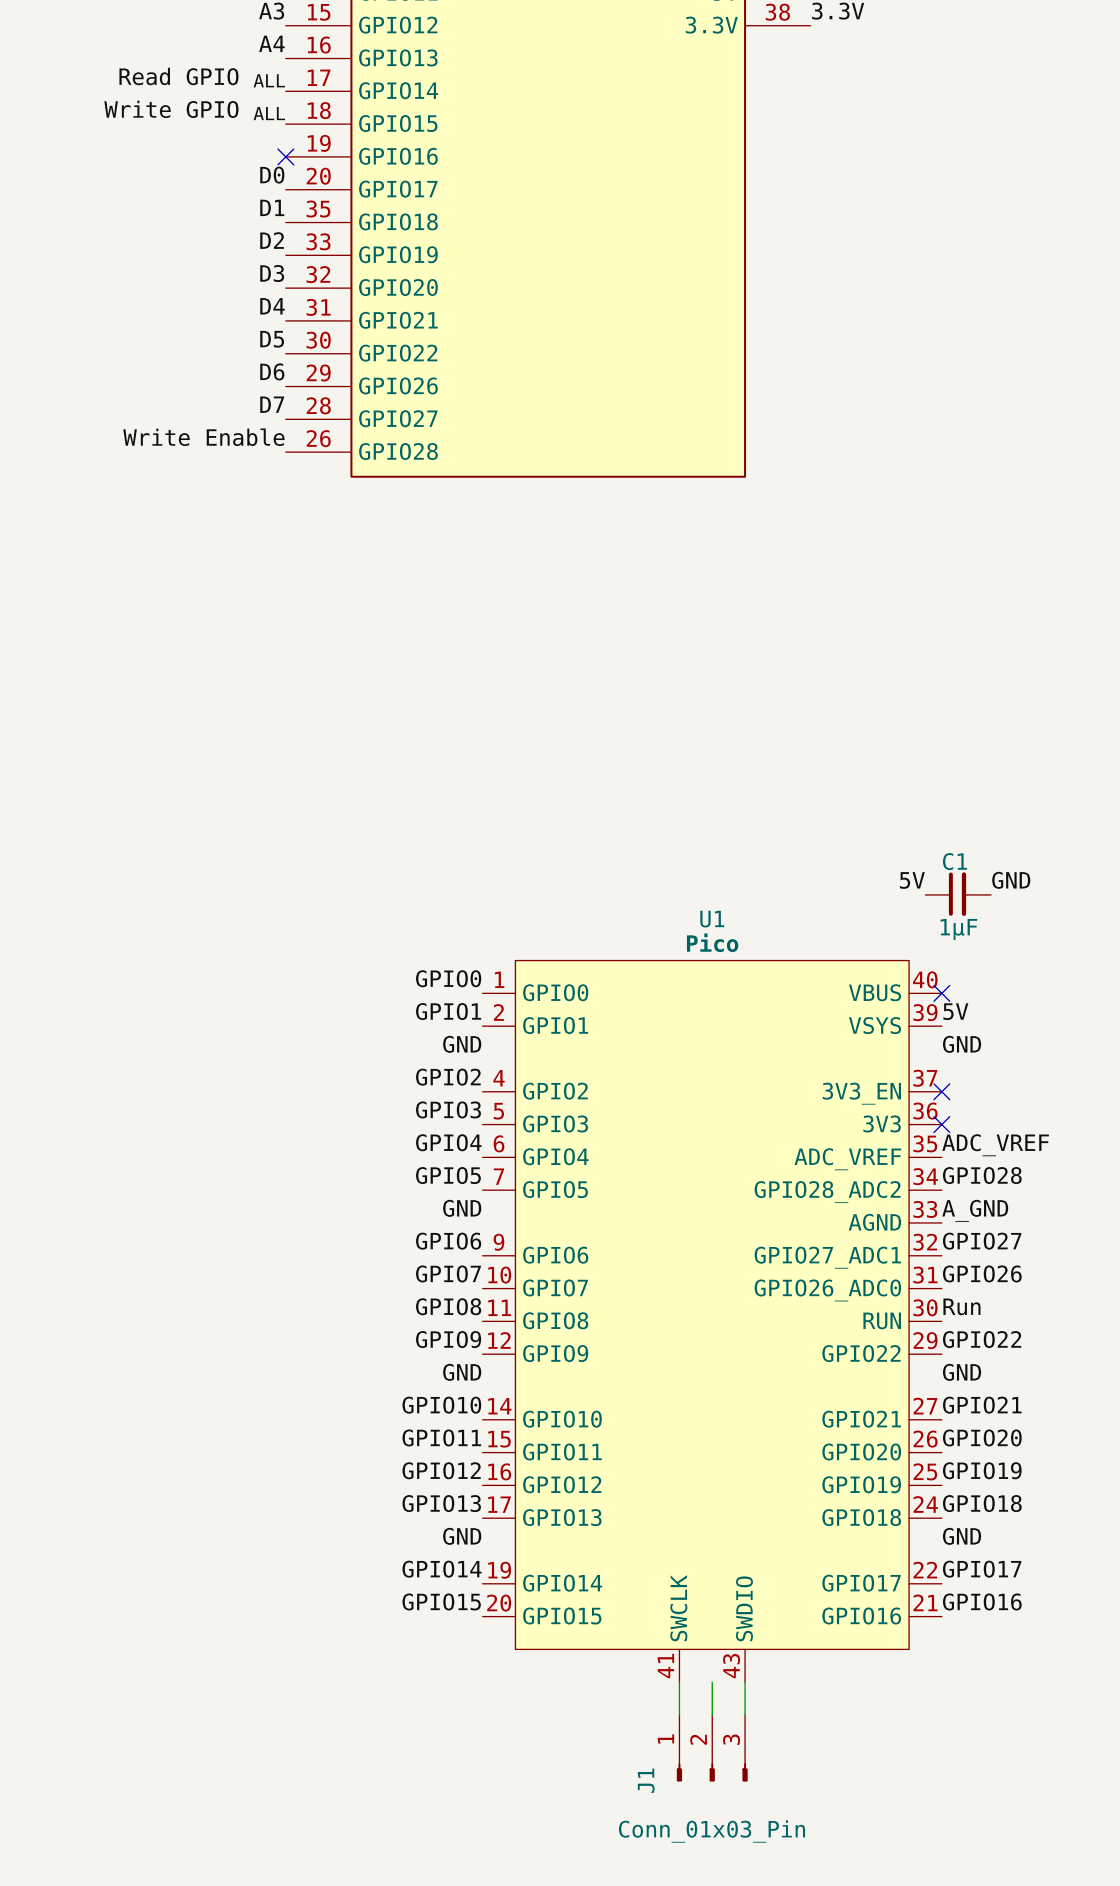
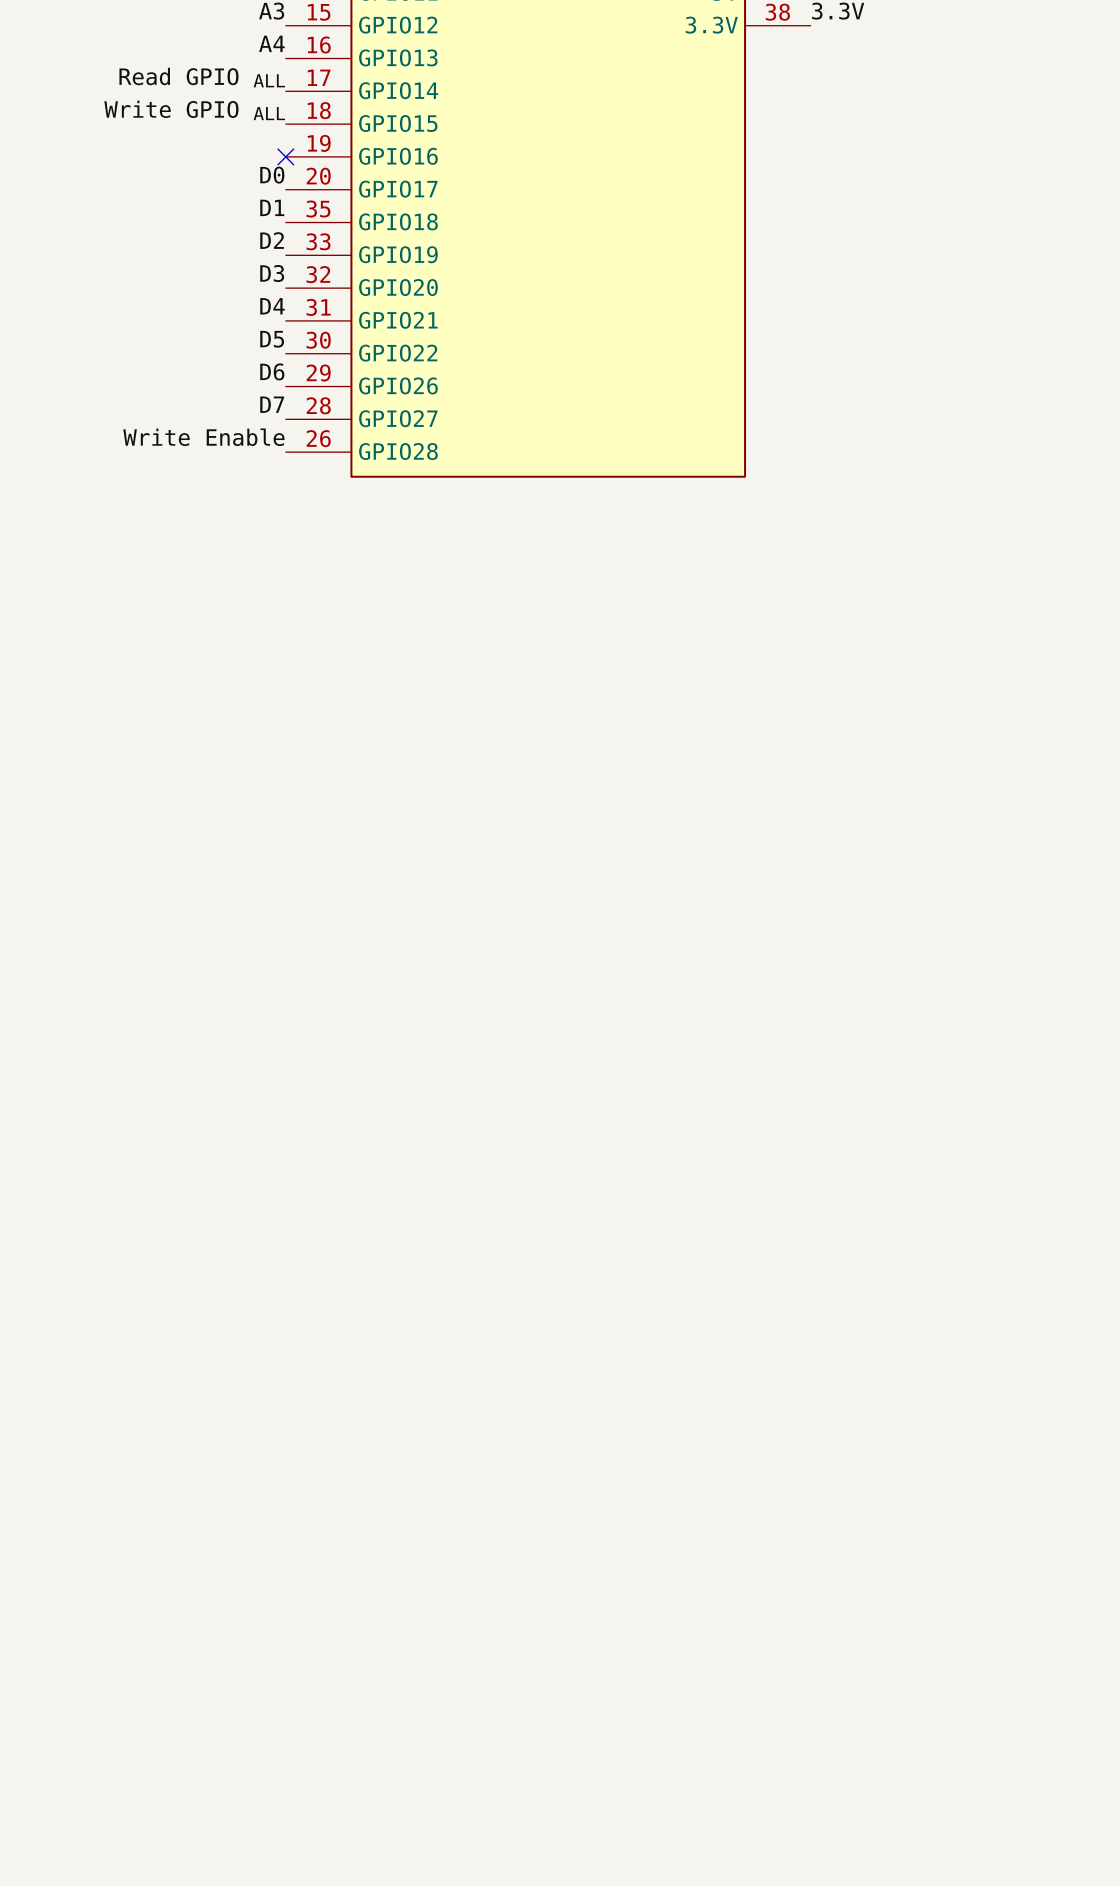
label: 5V (912, 880) -> none
label: GND (1011, 880) -> none
C1: 1μF (958, 894) -> none
label: GPIO0 (448, 978) -> none
no-connect mark: (941, 993) -> none
label: GPIO1 (448, 1011) -> none
label: 5V (955, 1011) -> none
label: GND (462, 1044) -> none
label: GND (962, 1044) -> none
label: GPIO2 (448, 1077) -> none
no-connect mark: (941, 1091) -> none
label: GPIO3 (448, 1109) -> none
no-connect mark: (941, 1124) -> none
label: GPIO4 (448, 1142) -> none
label: ADC_VREF (995, 1145) -> none
label: GPIO5 (448, 1175) -> none
label: GPIO28 (982, 1175) -> none
label: GND (462, 1208) -> none
label: A_GND (975, 1210) -> none
label: GPIO6 (448, 1241) -> none
label: GPIO27 (982, 1241) -> none
label: GPIO7 (448, 1273) -> none
label: GPIO26 (982, 1273) -> none
label: GPIO8 (448, 1306) -> none
label: Run (961, 1306) -> none
U1: Pico (712, 1321) -> none
label: GPIO9 (448, 1339) -> none
label: GPIO22 (982, 1339) -> none
label: GND (462, 1372) -> none
label: GND (962, 1372) -> none
label: GPIO10 (441, 1405) -> none
label: GPIO21 (982, 1405) -> none
label: GPIO11 (441, 1437) -> none
label: GPIO20 (982, 1437) -> none
label: GPIO12 (441, 1470) -> none
label: GPIO19 (982, 1470) -> none
label: GPIO13 (441, 1503) -> none
label: GPIO18 (982, 1503) -> none
label: GND (462, 1536) -> none
label: GND (962, 1536) -> none
label: GPIO14 (442, 1569) -> none
label: GPIO17 (982, 1569) -> none
label: GPIO15 (441, 1601) -> none
label: GPIO16 (982, 1601) -> none
wire: (679, 1682) (679, 1715) -> none
wire: (712, 1682) (712, 1715) -> none
wire: (745, 1682) (745, 1715) -> none
J1: Conn_01x03_Pin (712, 1748) -> none

